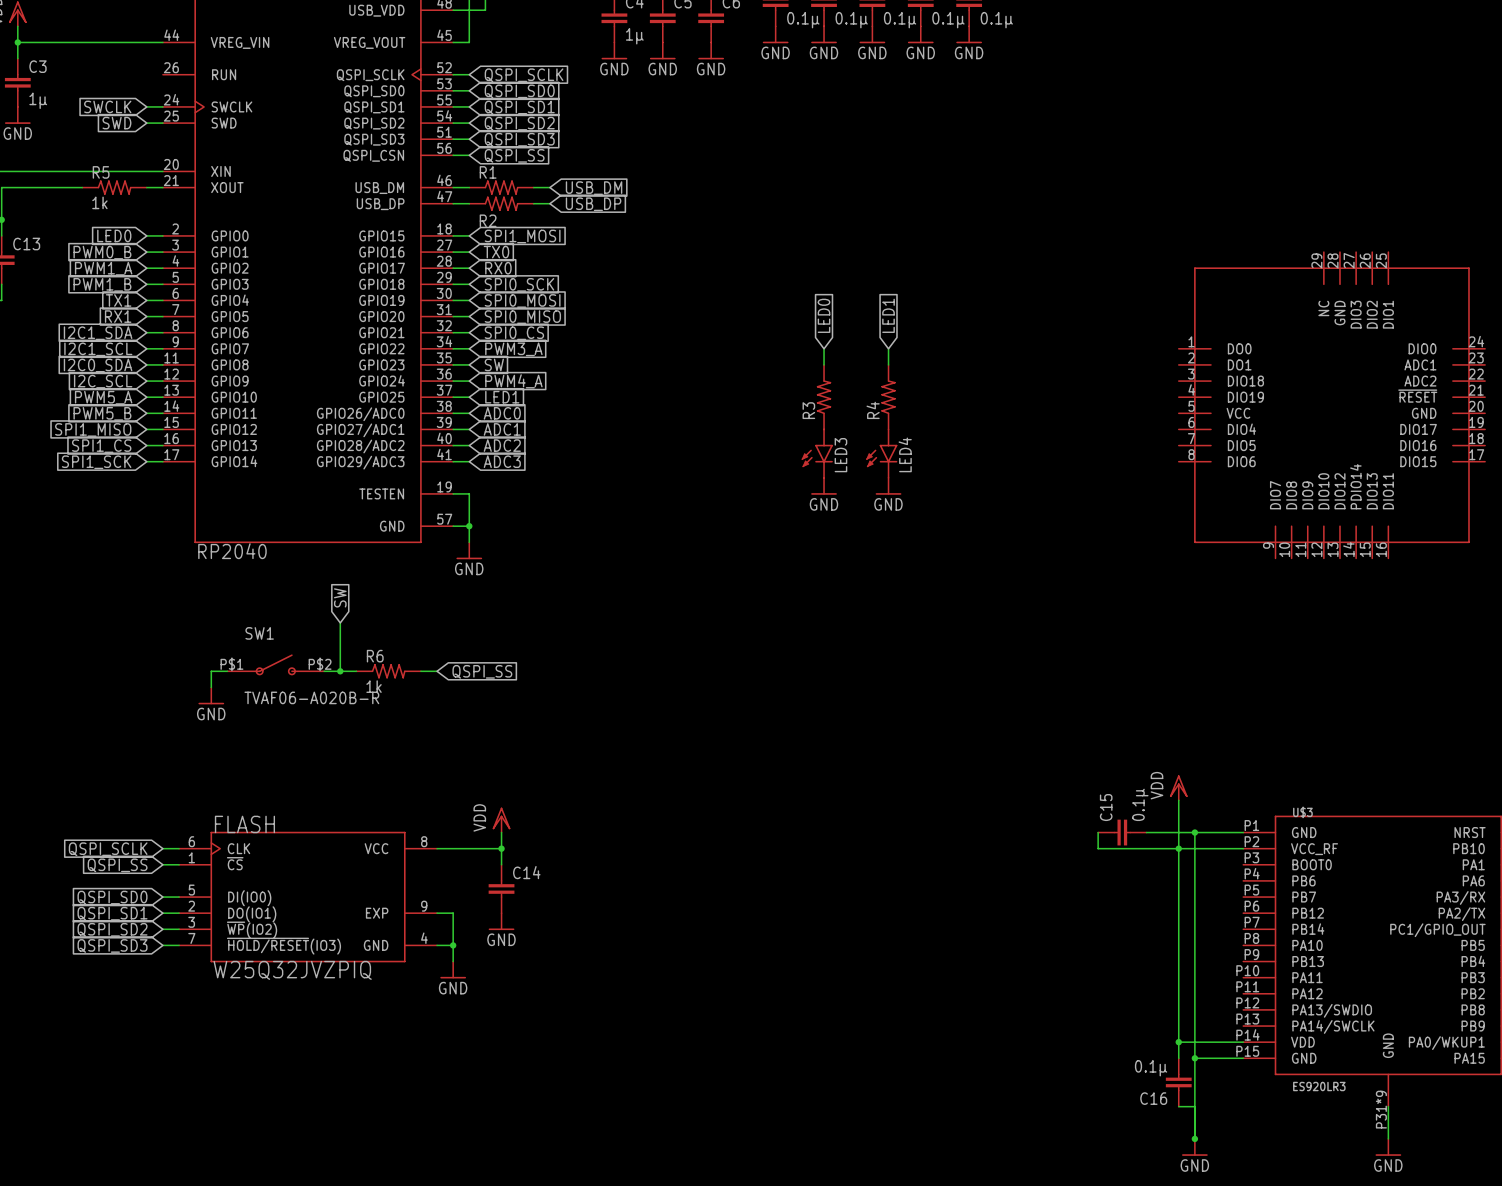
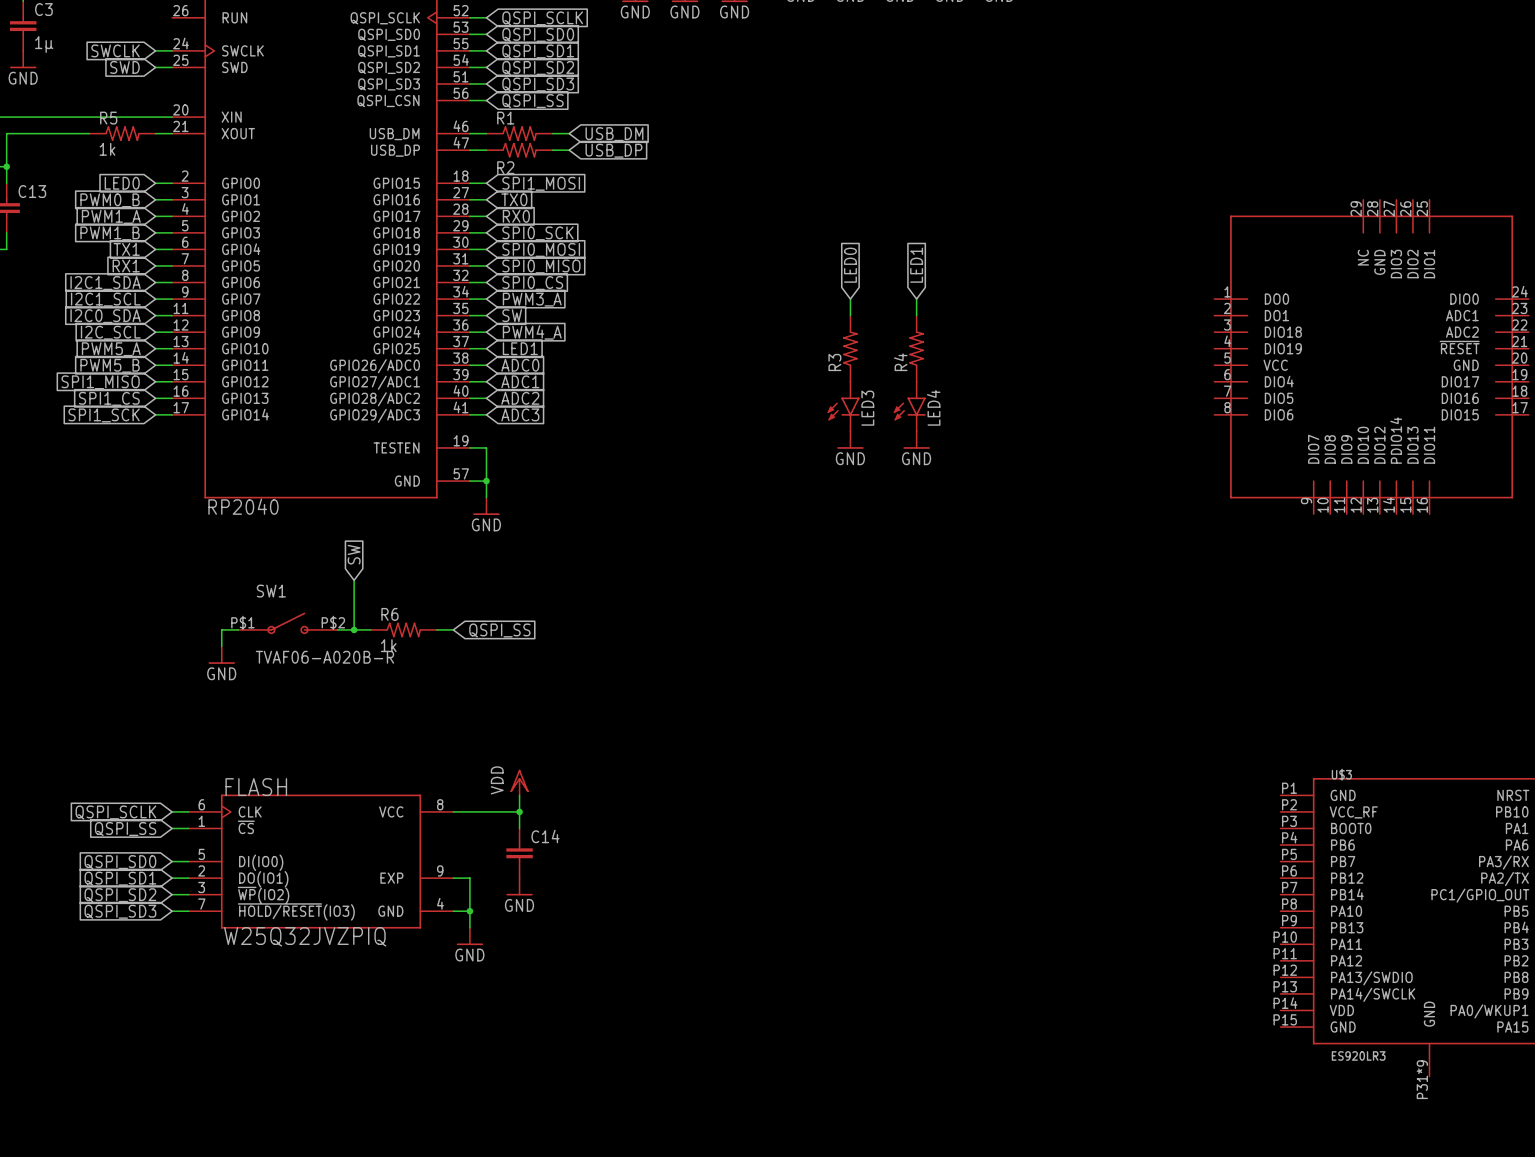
power symbol: VDD (1178, 787) -> none
wire: (1178, 800) (1178, 1058) -> none
wire: (1098, 832) (1098, 848) (1243, 848) -> none
C15: 0.1µ (1122, 832) -> none
wire: (1146, 832) (1243, 832) -> none
wire: (1194, 832) (1194, 1138) -> none
junction: (1194, 832) -> none
junction: (1178, 848) -> none
wire: (1178, 1042) (1243, 1042) -> none
junction: (1178, 1042) -> none
wire: (1194, 1058) (1243, 1058) -> none
junction: (1194, 1058) -> none
C16: 0.1µ (1178, 1082) -> none
wire: (1178, 1106) (1194, 1106) -> none
wire: (1388, 1106) (1388, 1138) -> none
junction: (1194, 1138) -> none
power symbol: GND (1194, 1147) -> none
power symbol: GND (1388, 1147) -> none

